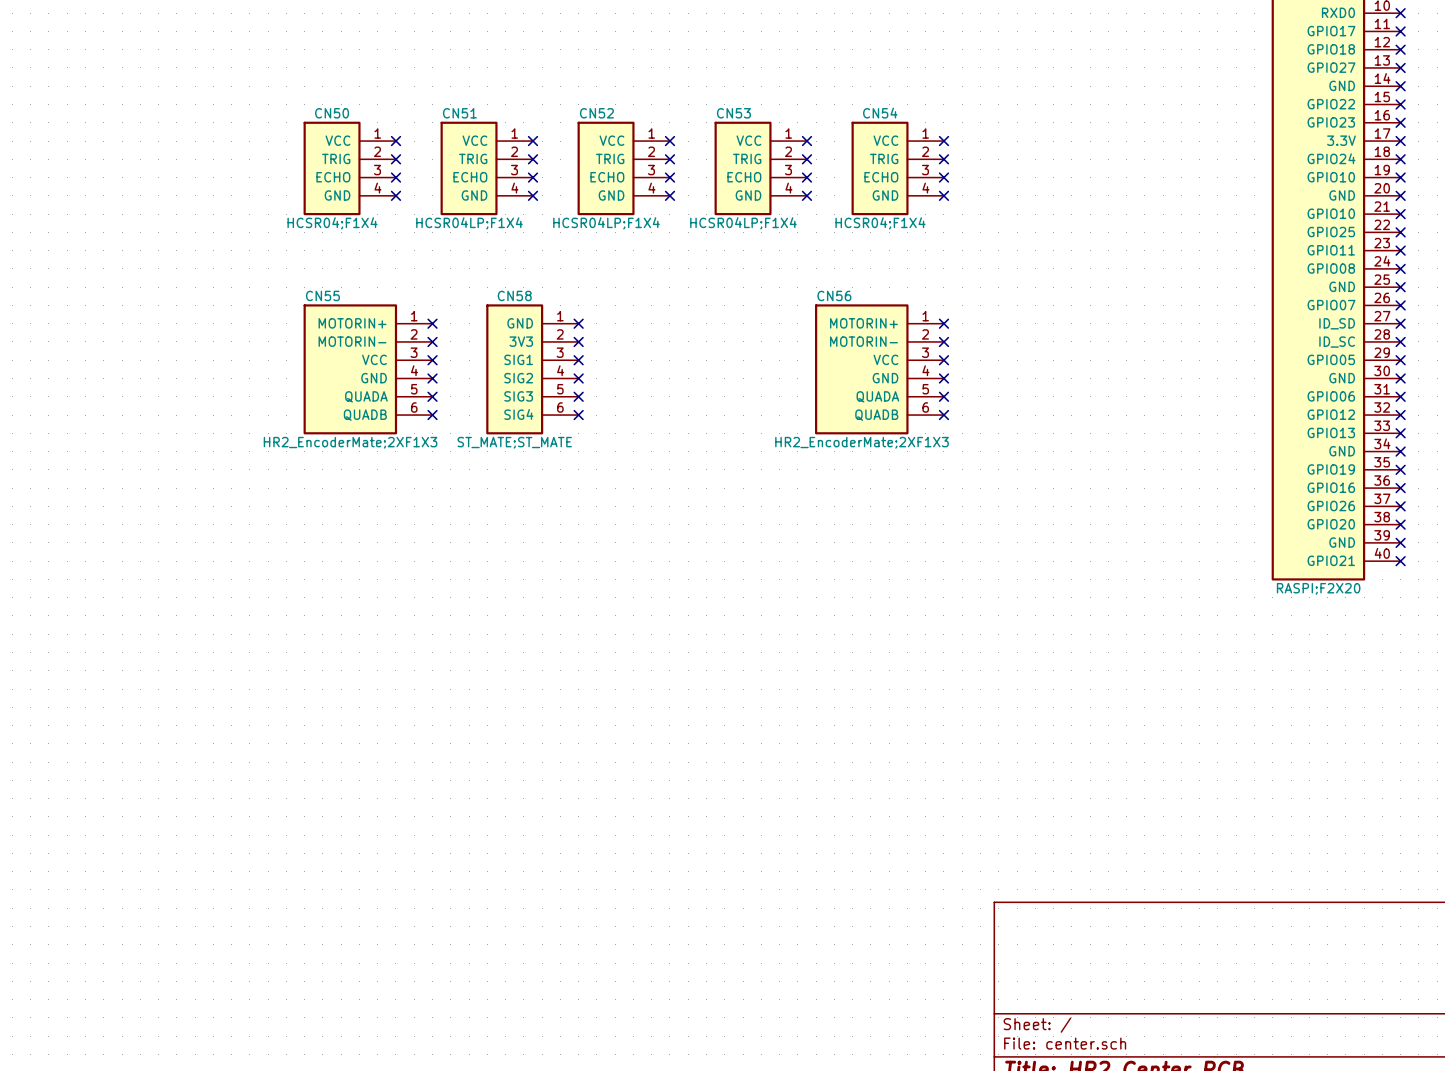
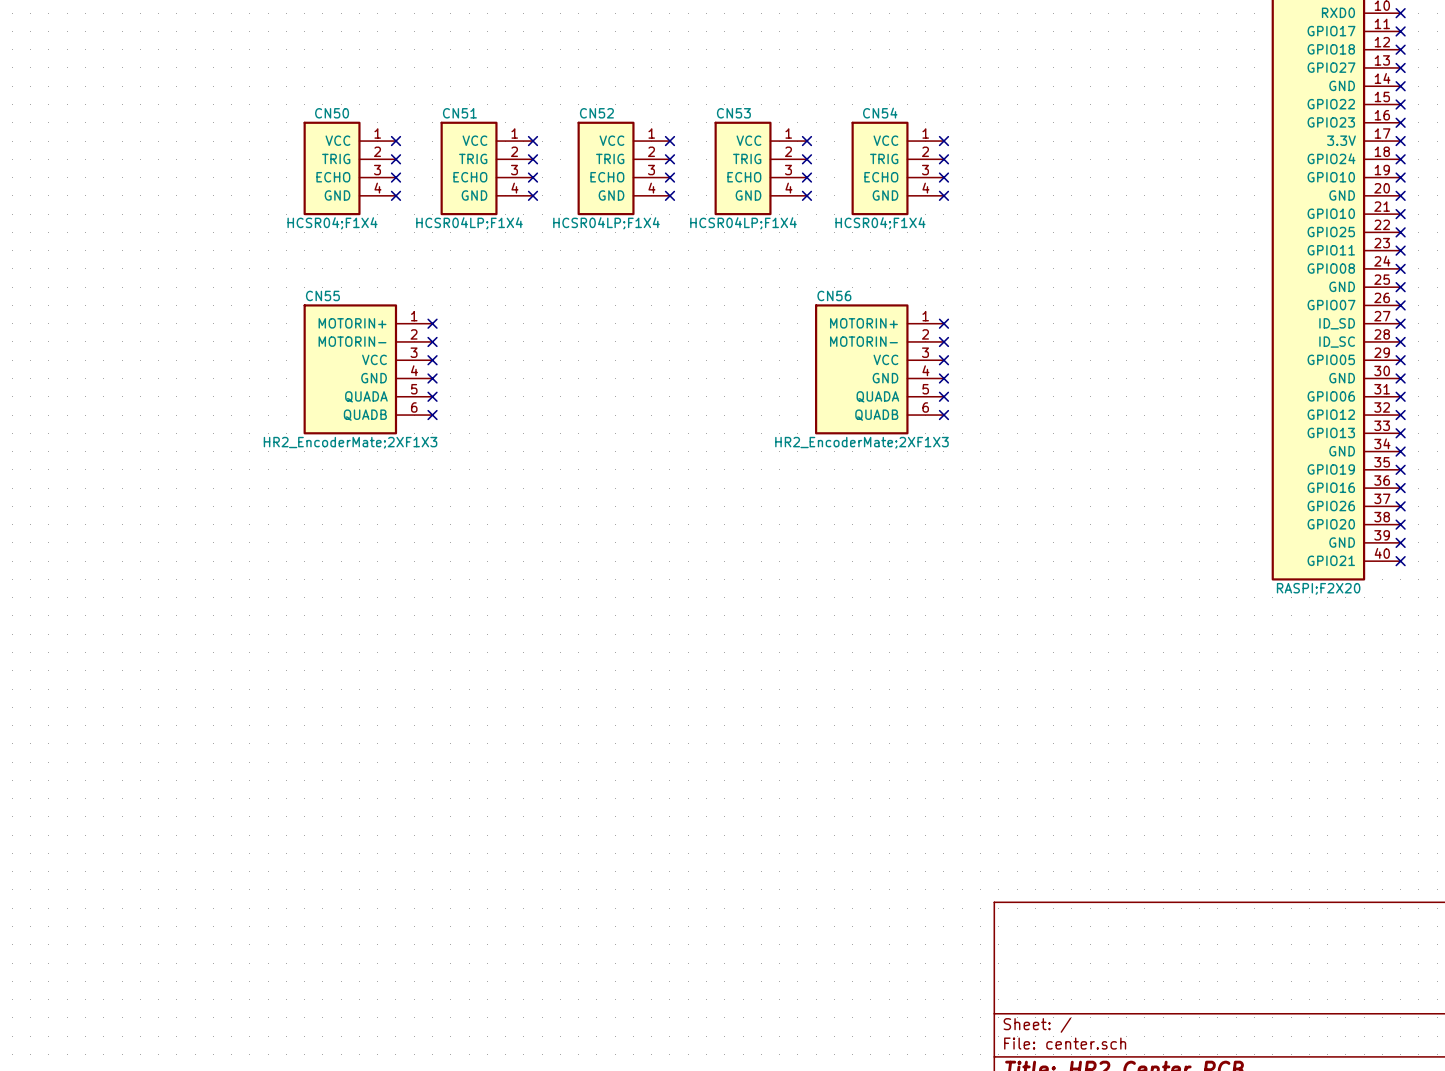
no-connect mark: (578, 323) -> none
no-connect mark: (578, 341) -> none
no-connect mark: (578, 360) -> none
CN58: ST_MATE;ST_MATE (532, 369) -> none
no-connect mark: (578, 378) -> none
no-connect mark: (578, 396) -> none
no-connect mark: (578, 415) -> none

